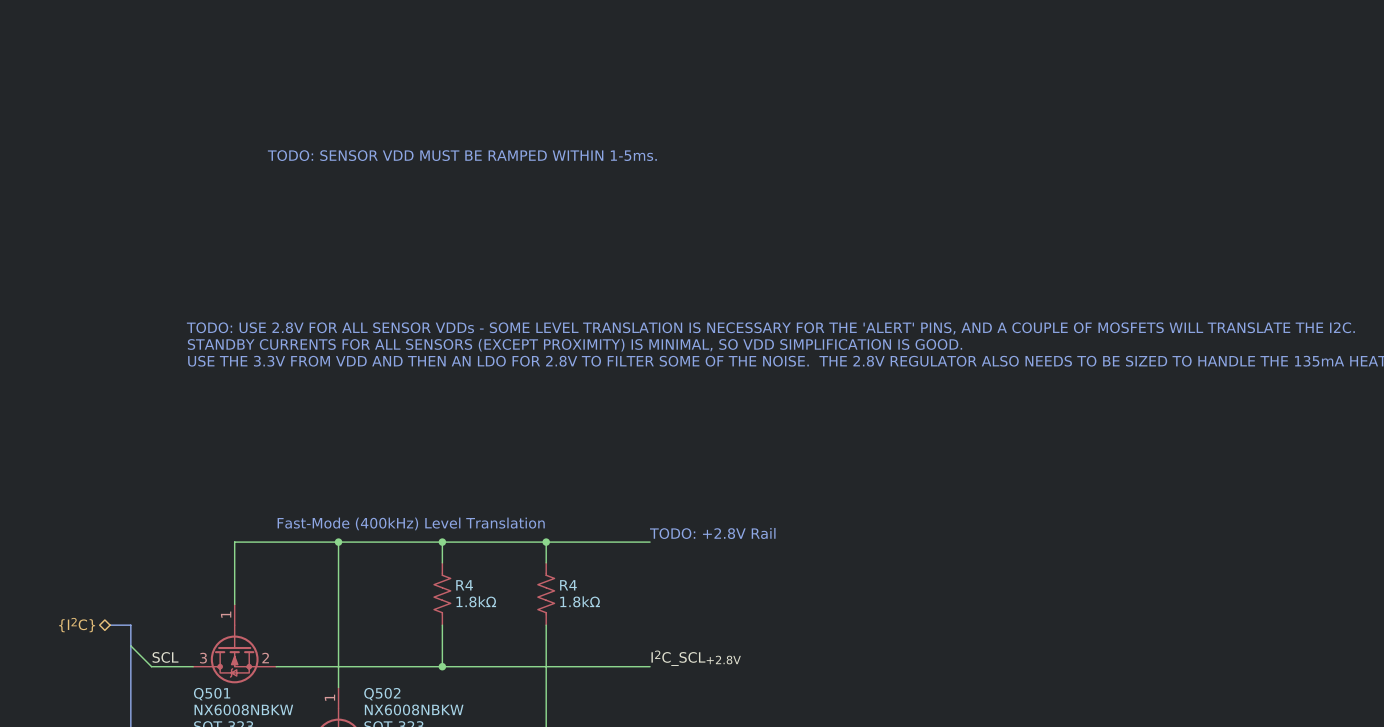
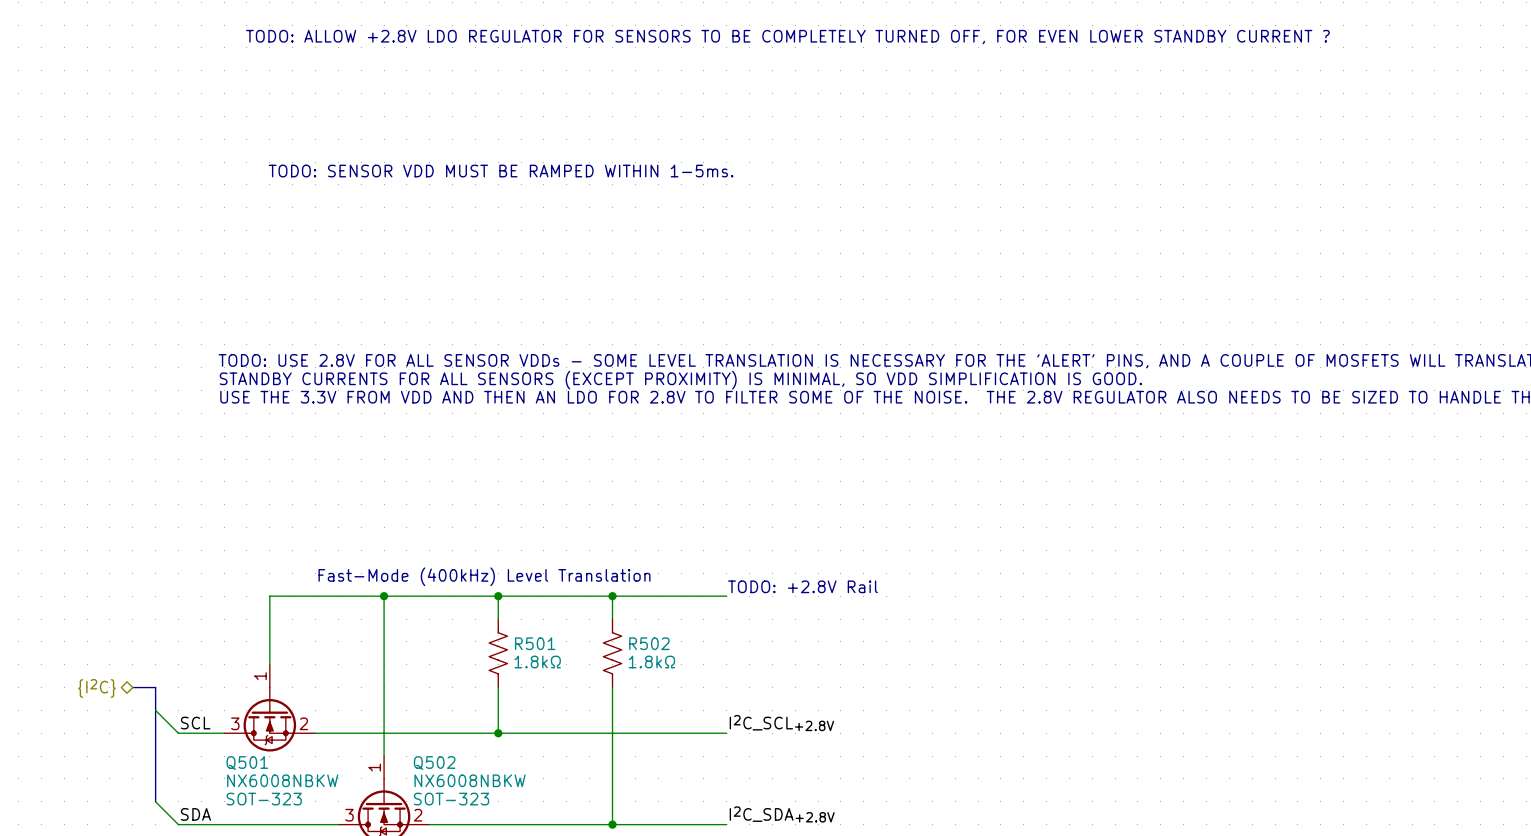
text: none -> TODO: ALLOW +2.8V LDO REGULATOR FOR SENSORS TO BE COMPLETELY TURNED OFF, FOR EVEN LOWER STANDBY CURRENT ? (787, 37)
R4 name: R4 (464, 585) -> R501 (535, 643)
R4 name: R4 (568, 585) -> R502 (649, 643)

